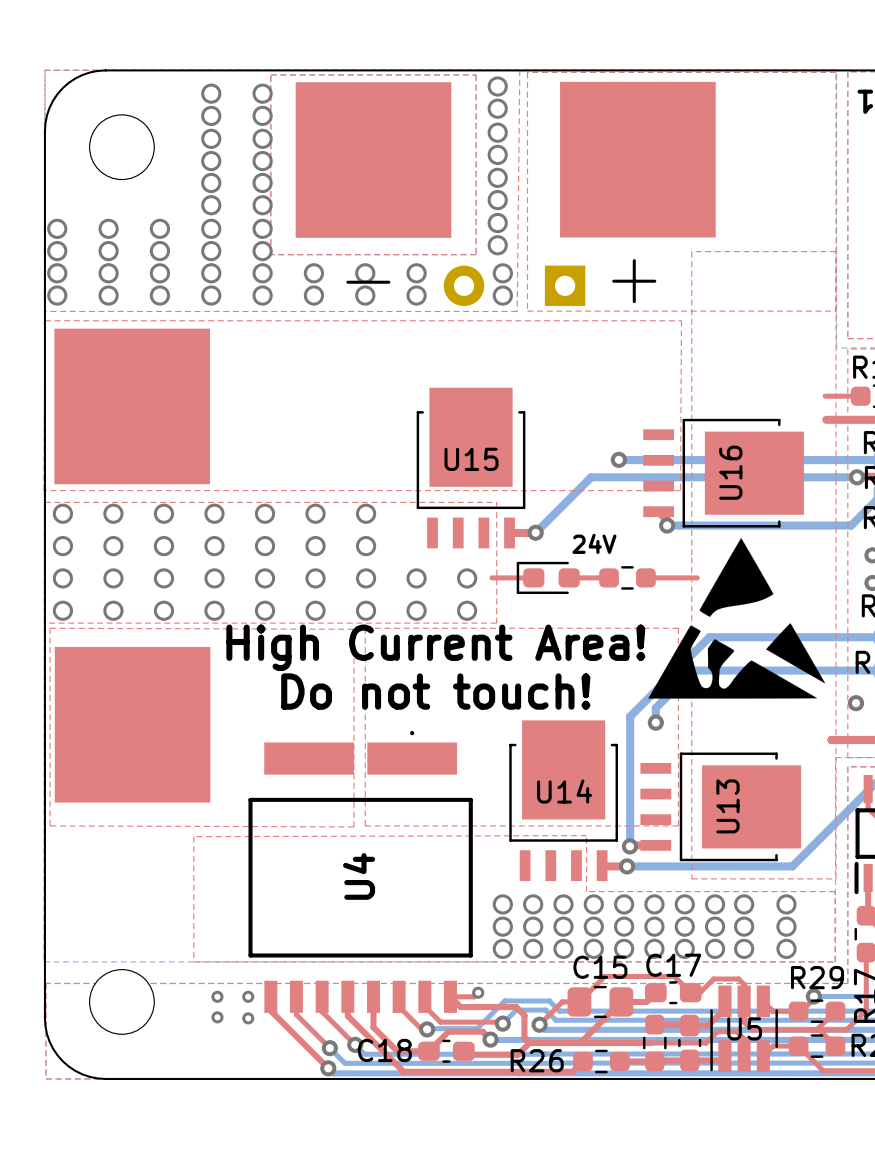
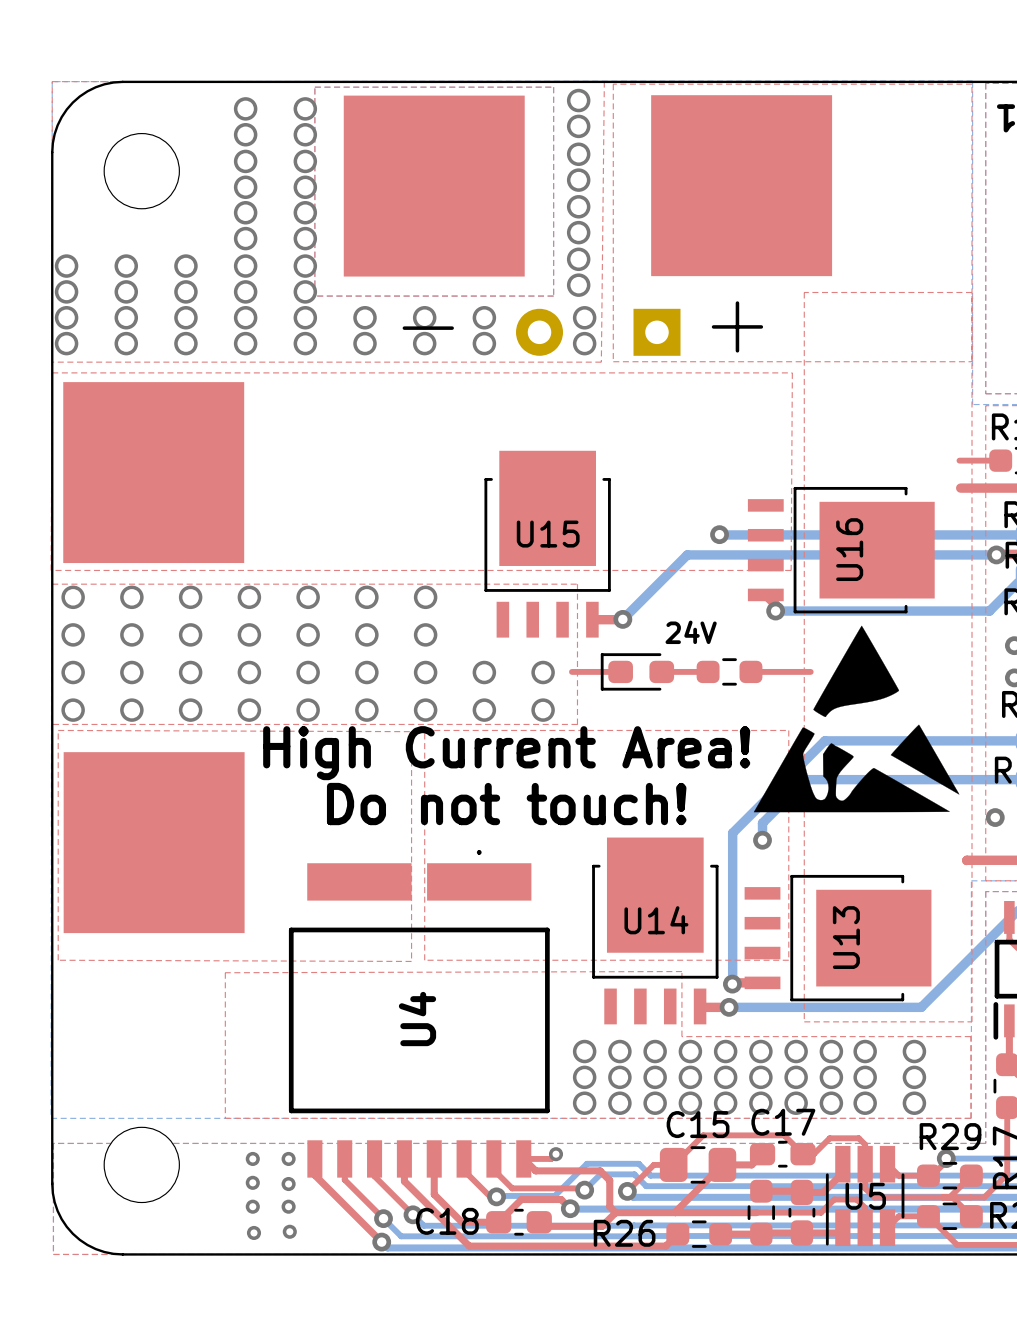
via: none -> (252, 1206)
via: none -> (288, 1206)
via: none -> (289, 1231)
via: none -> (253, 1232)

